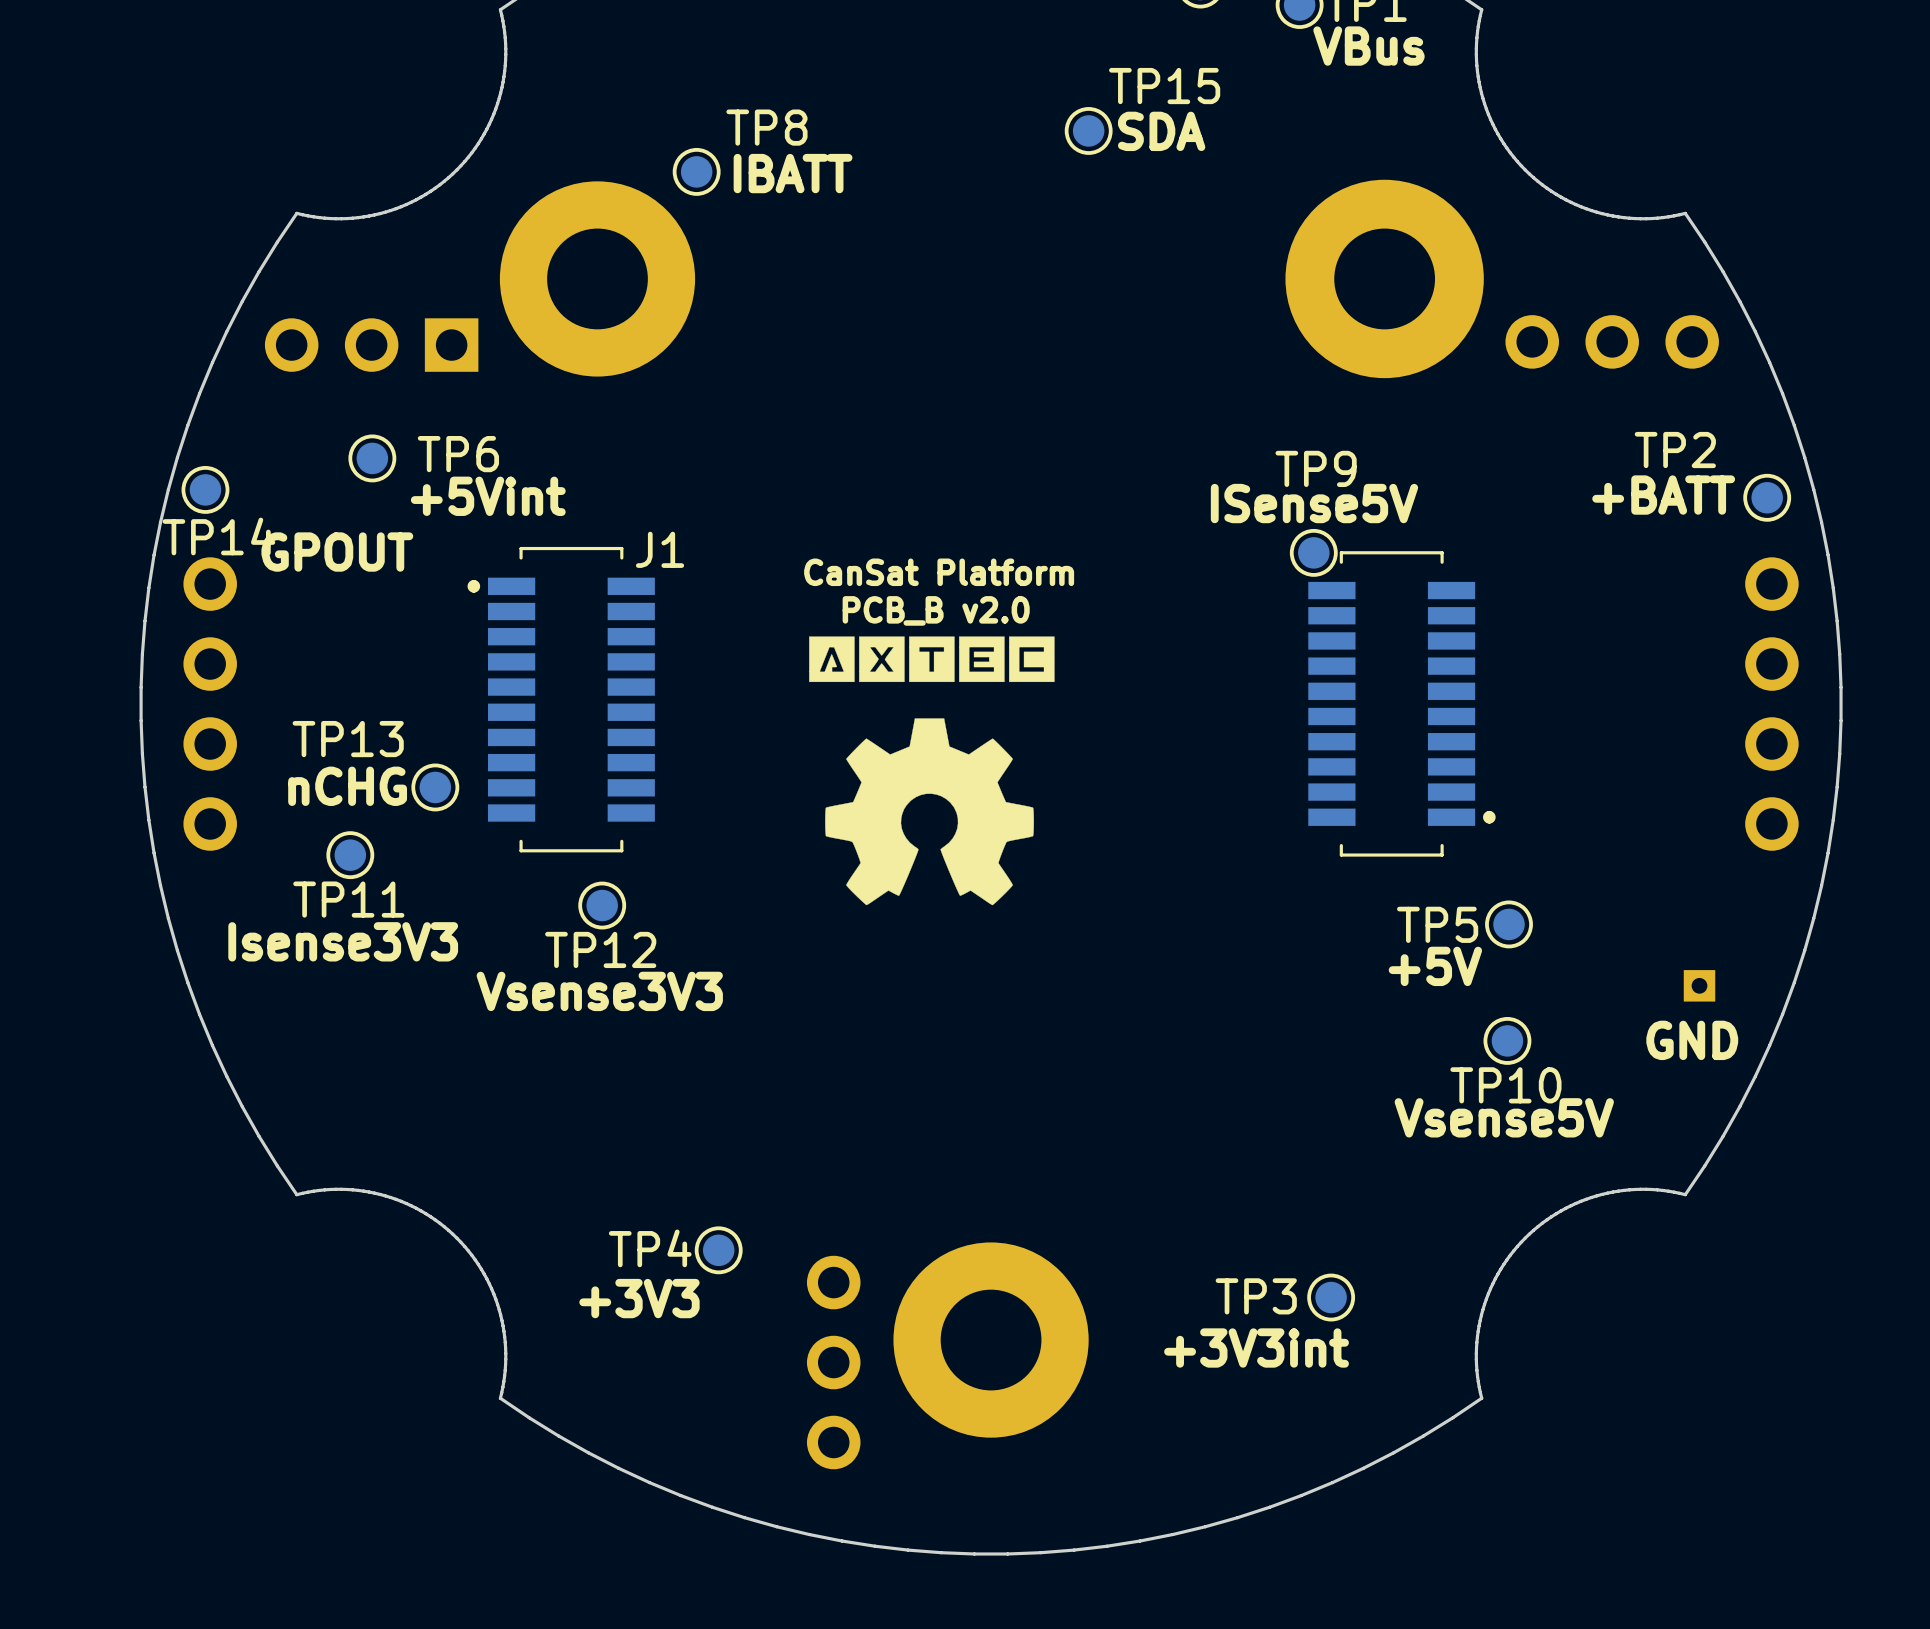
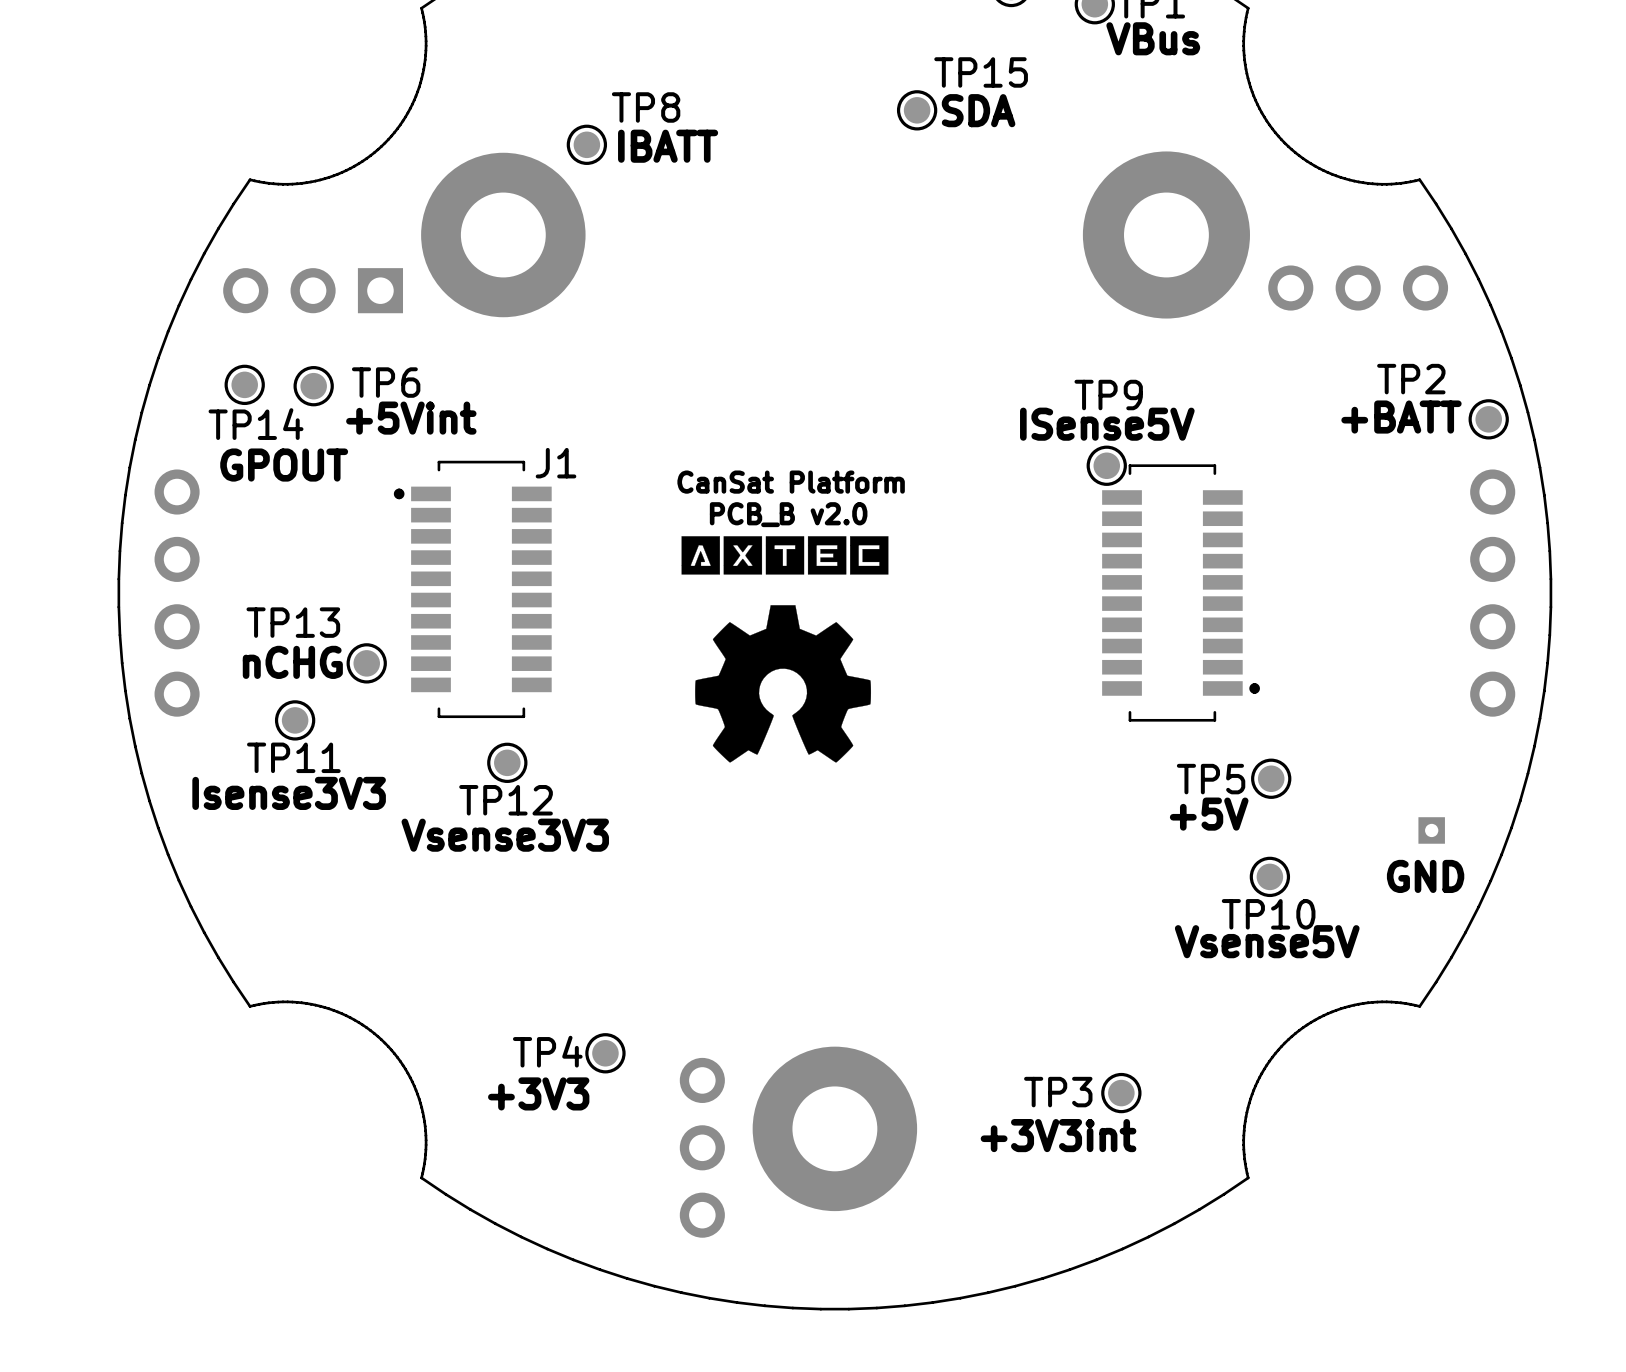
TP14 position: (205, 489) -> (244, 384)

